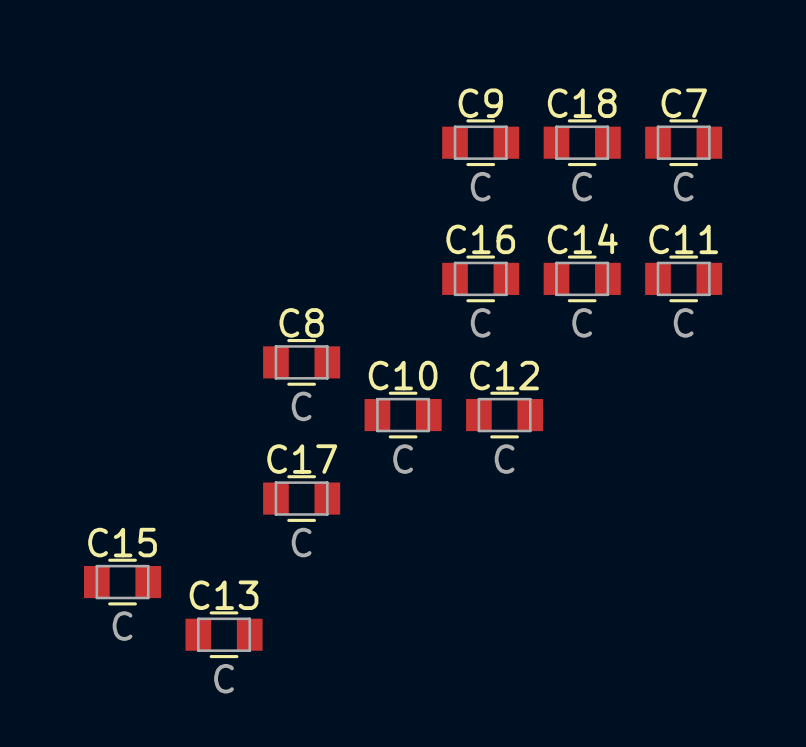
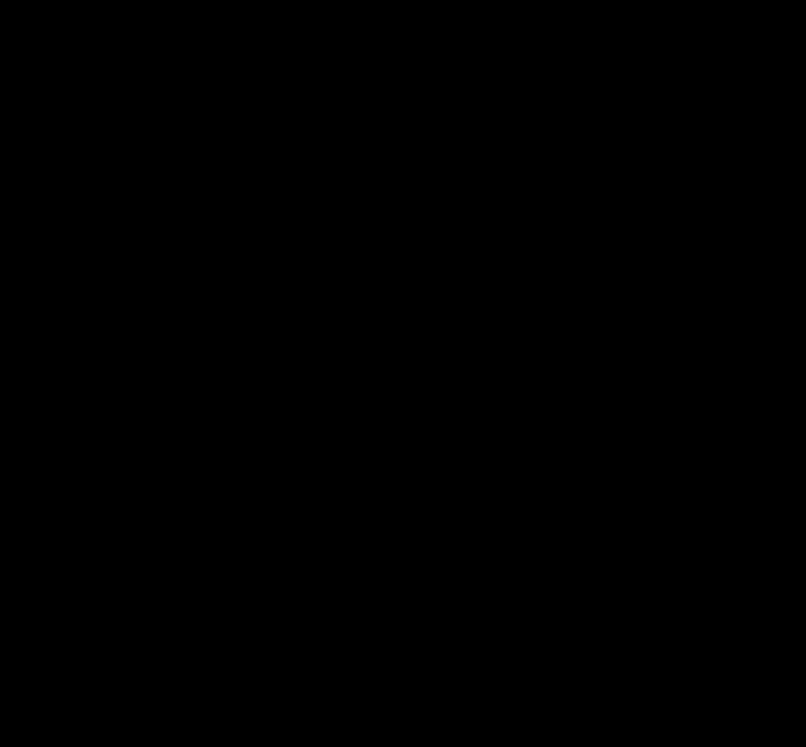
C9: C (480, 142) -> none
C18: C (582, 142) -> none
C7: C (683, 142) -> none
C16: C (480, 278) -> none
C14: C (582, 278) -> none
C11: C (683, 278) -> none
C8: C (301, 362) -> none
C10: C (403, 415) -> none
C12: C (504, 415) -> none
C17: C (301, 498) -> none
C15: C (122, 582) -> none
C13: C (224, 634) -> none

